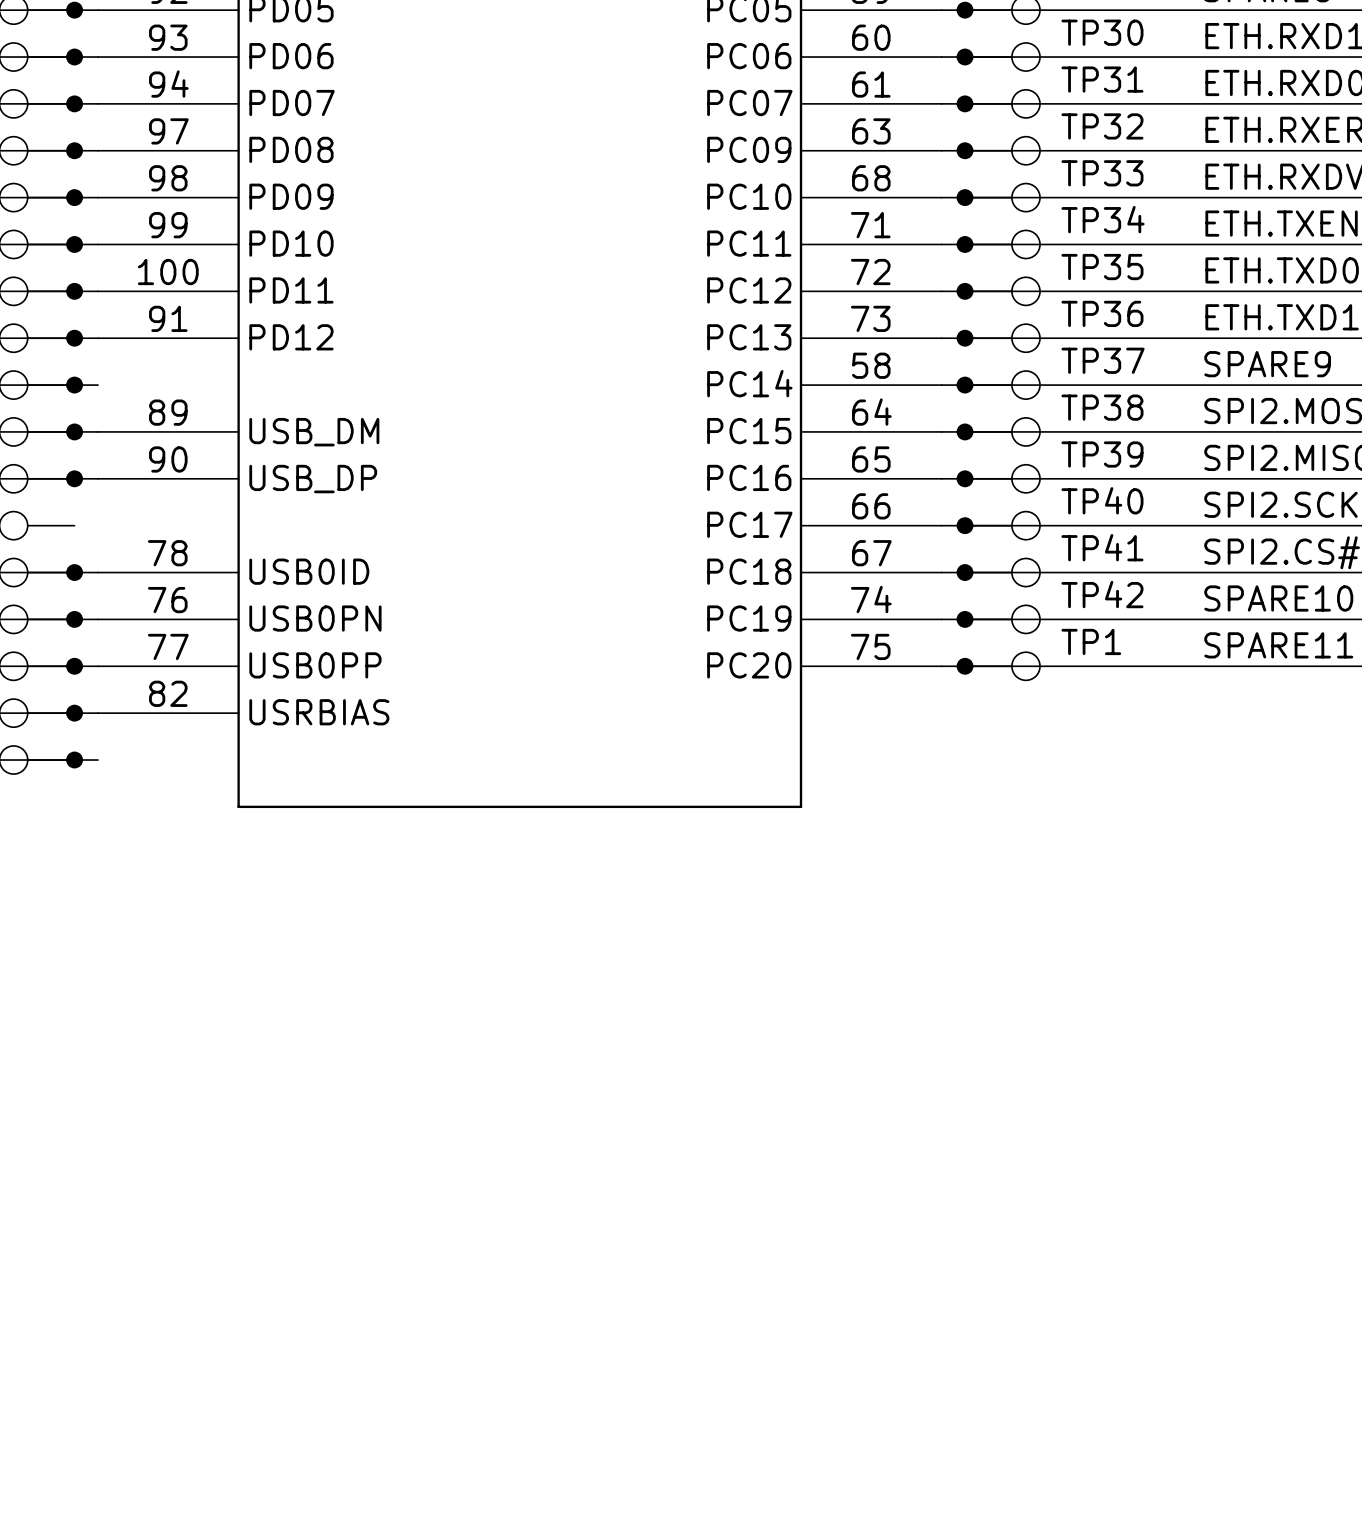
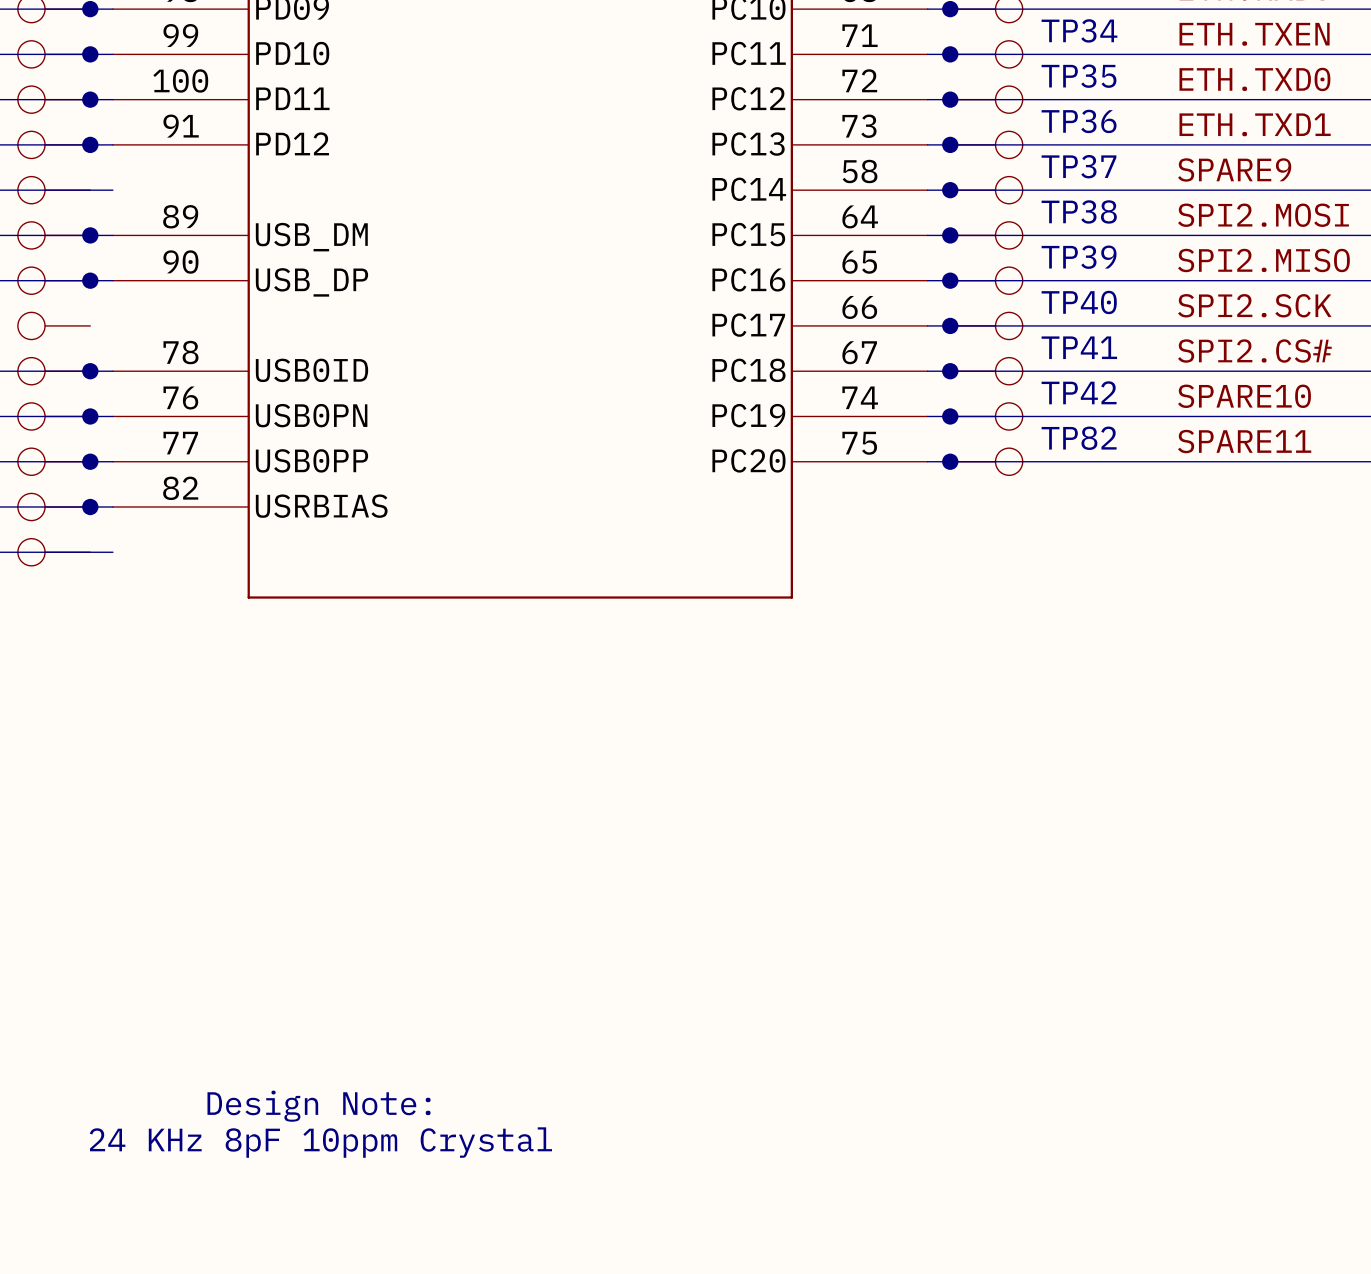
junction: (74, 385) -> none
TP1 name: TP1 (1091, 641) -> TP82 (1079, 438)
junction: (74, 760) -> none
text: none -> Design Note: (319, 1106)
text: none -> 24 KHz 8pF 10ppm Crystal (320, 1142)

